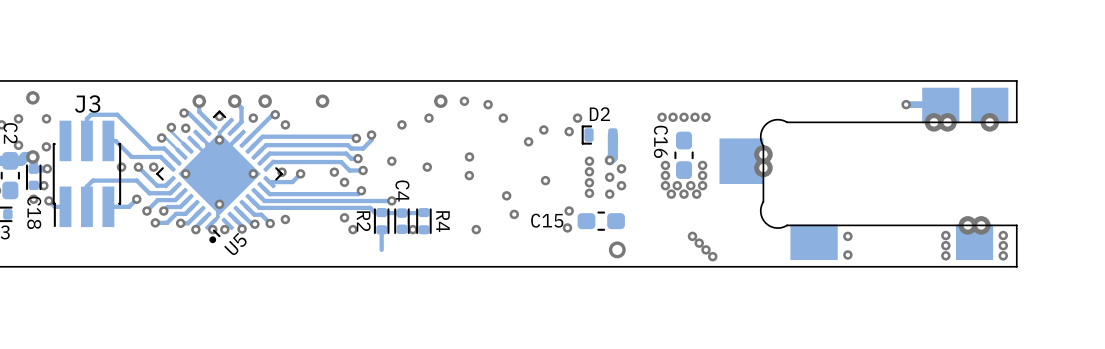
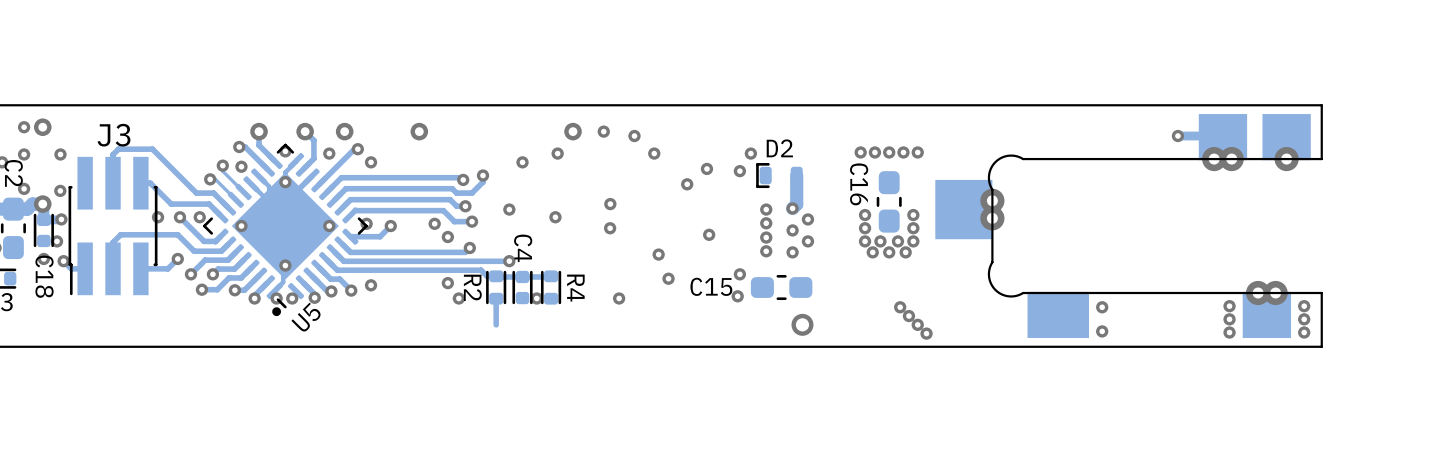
via: none -> (24, 127)

